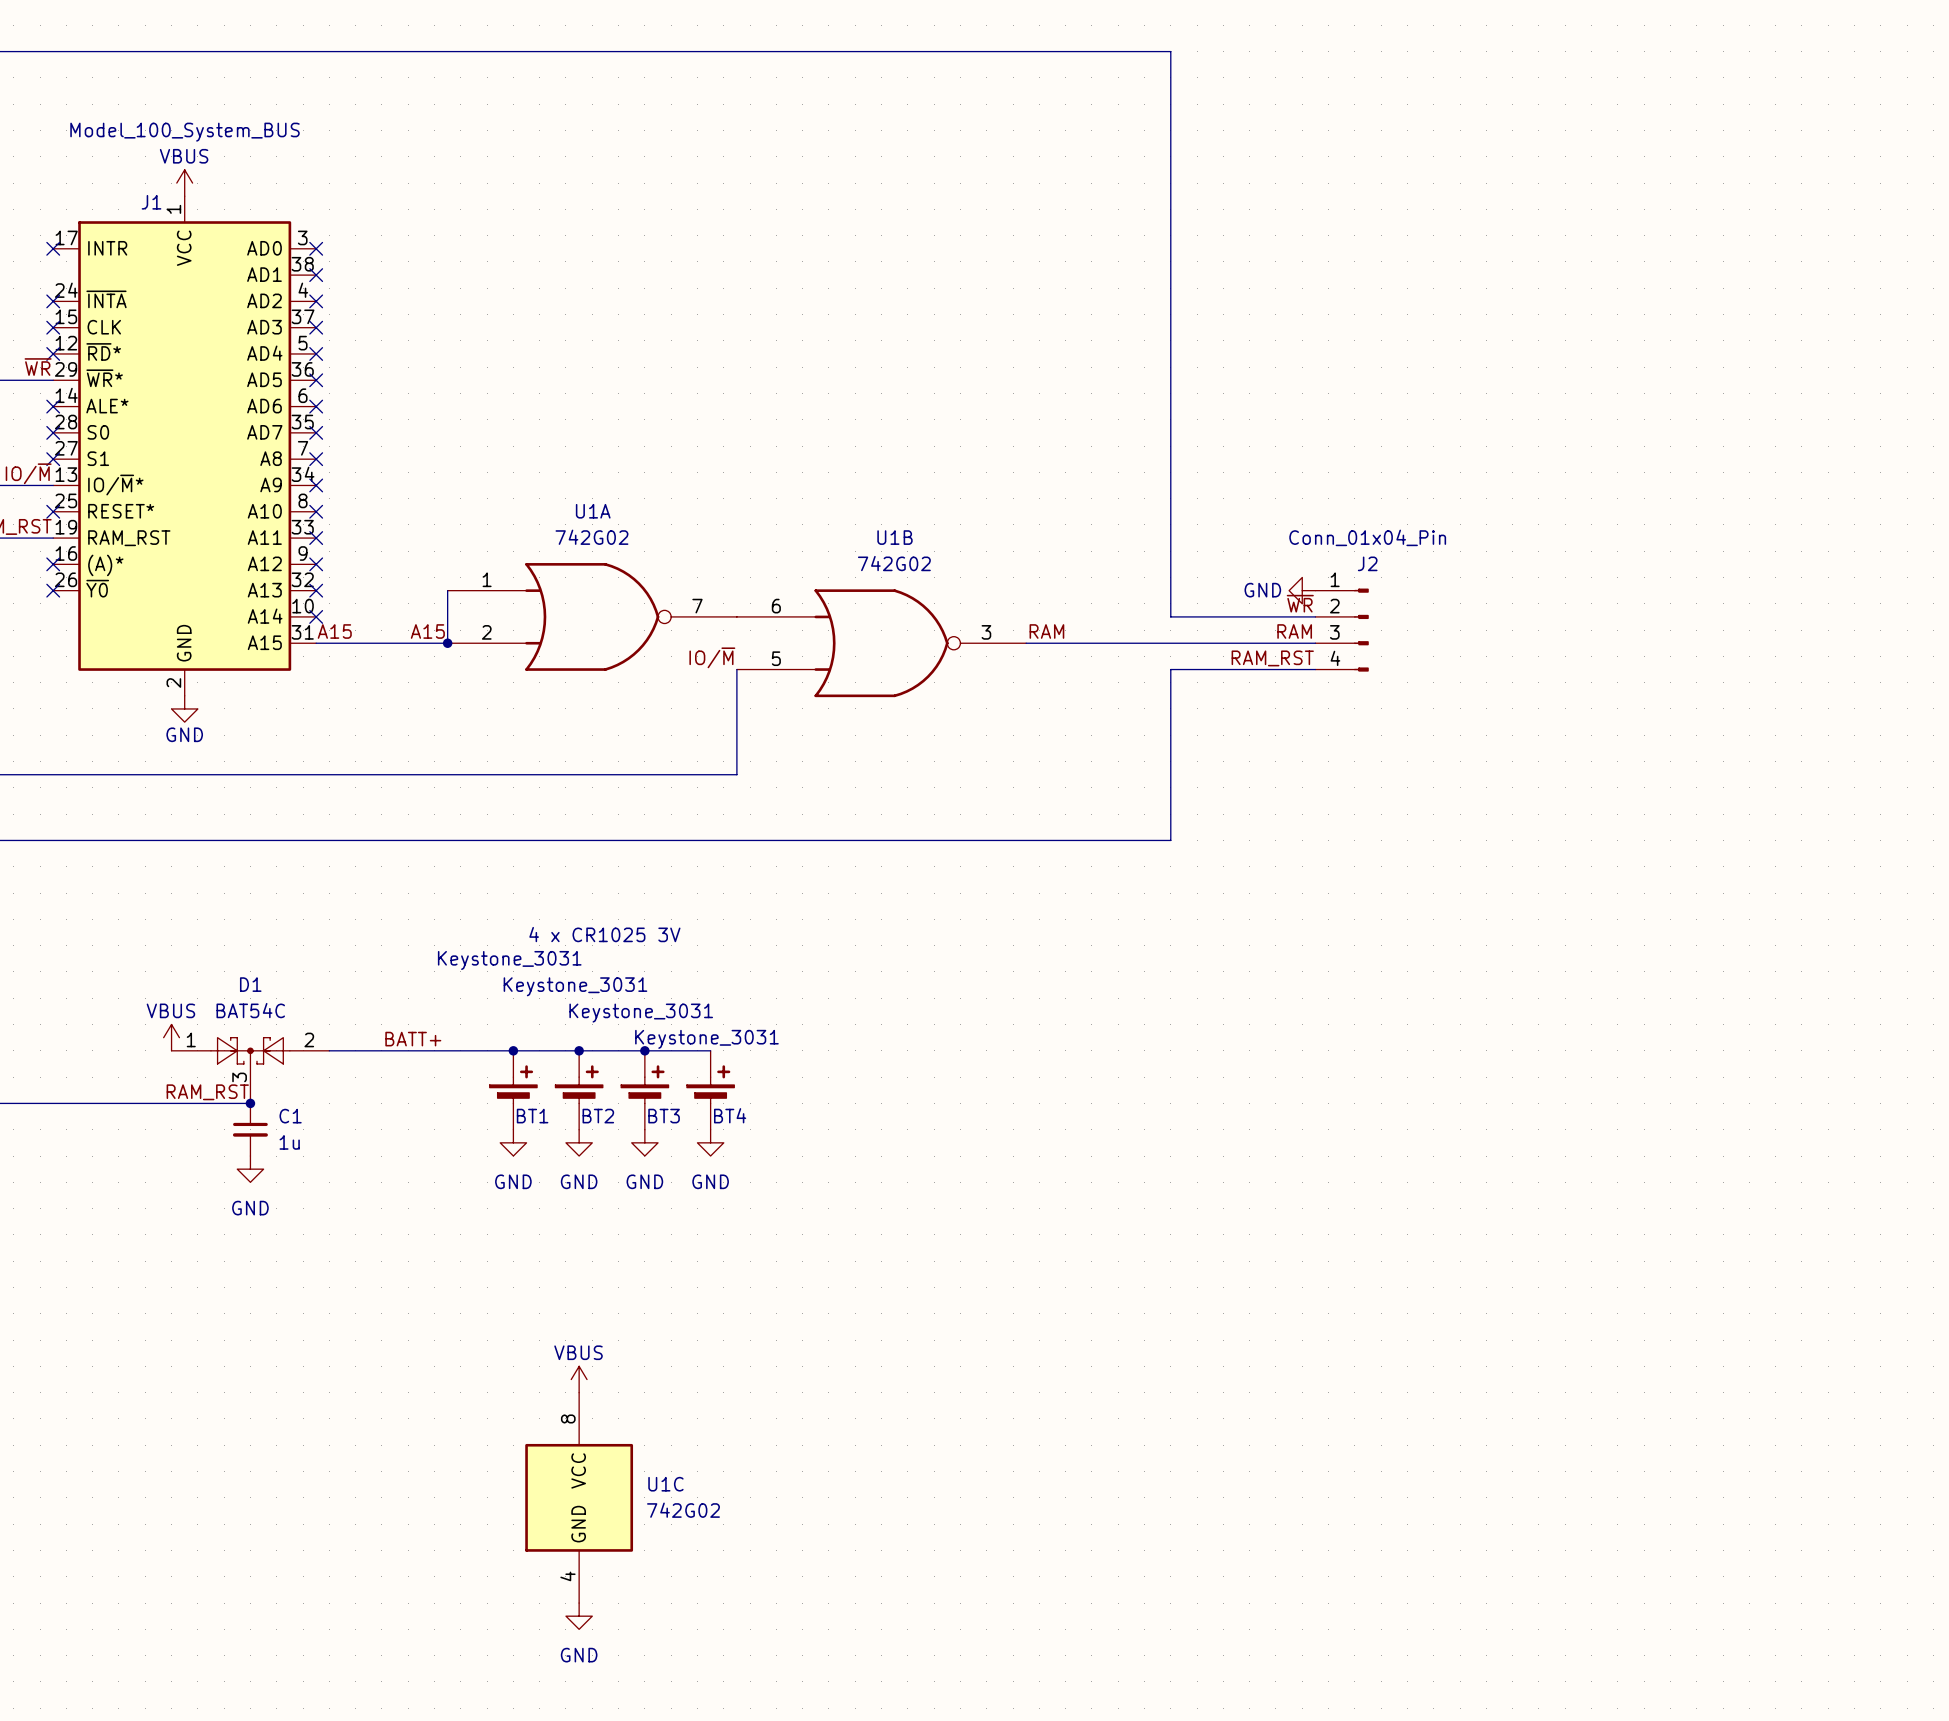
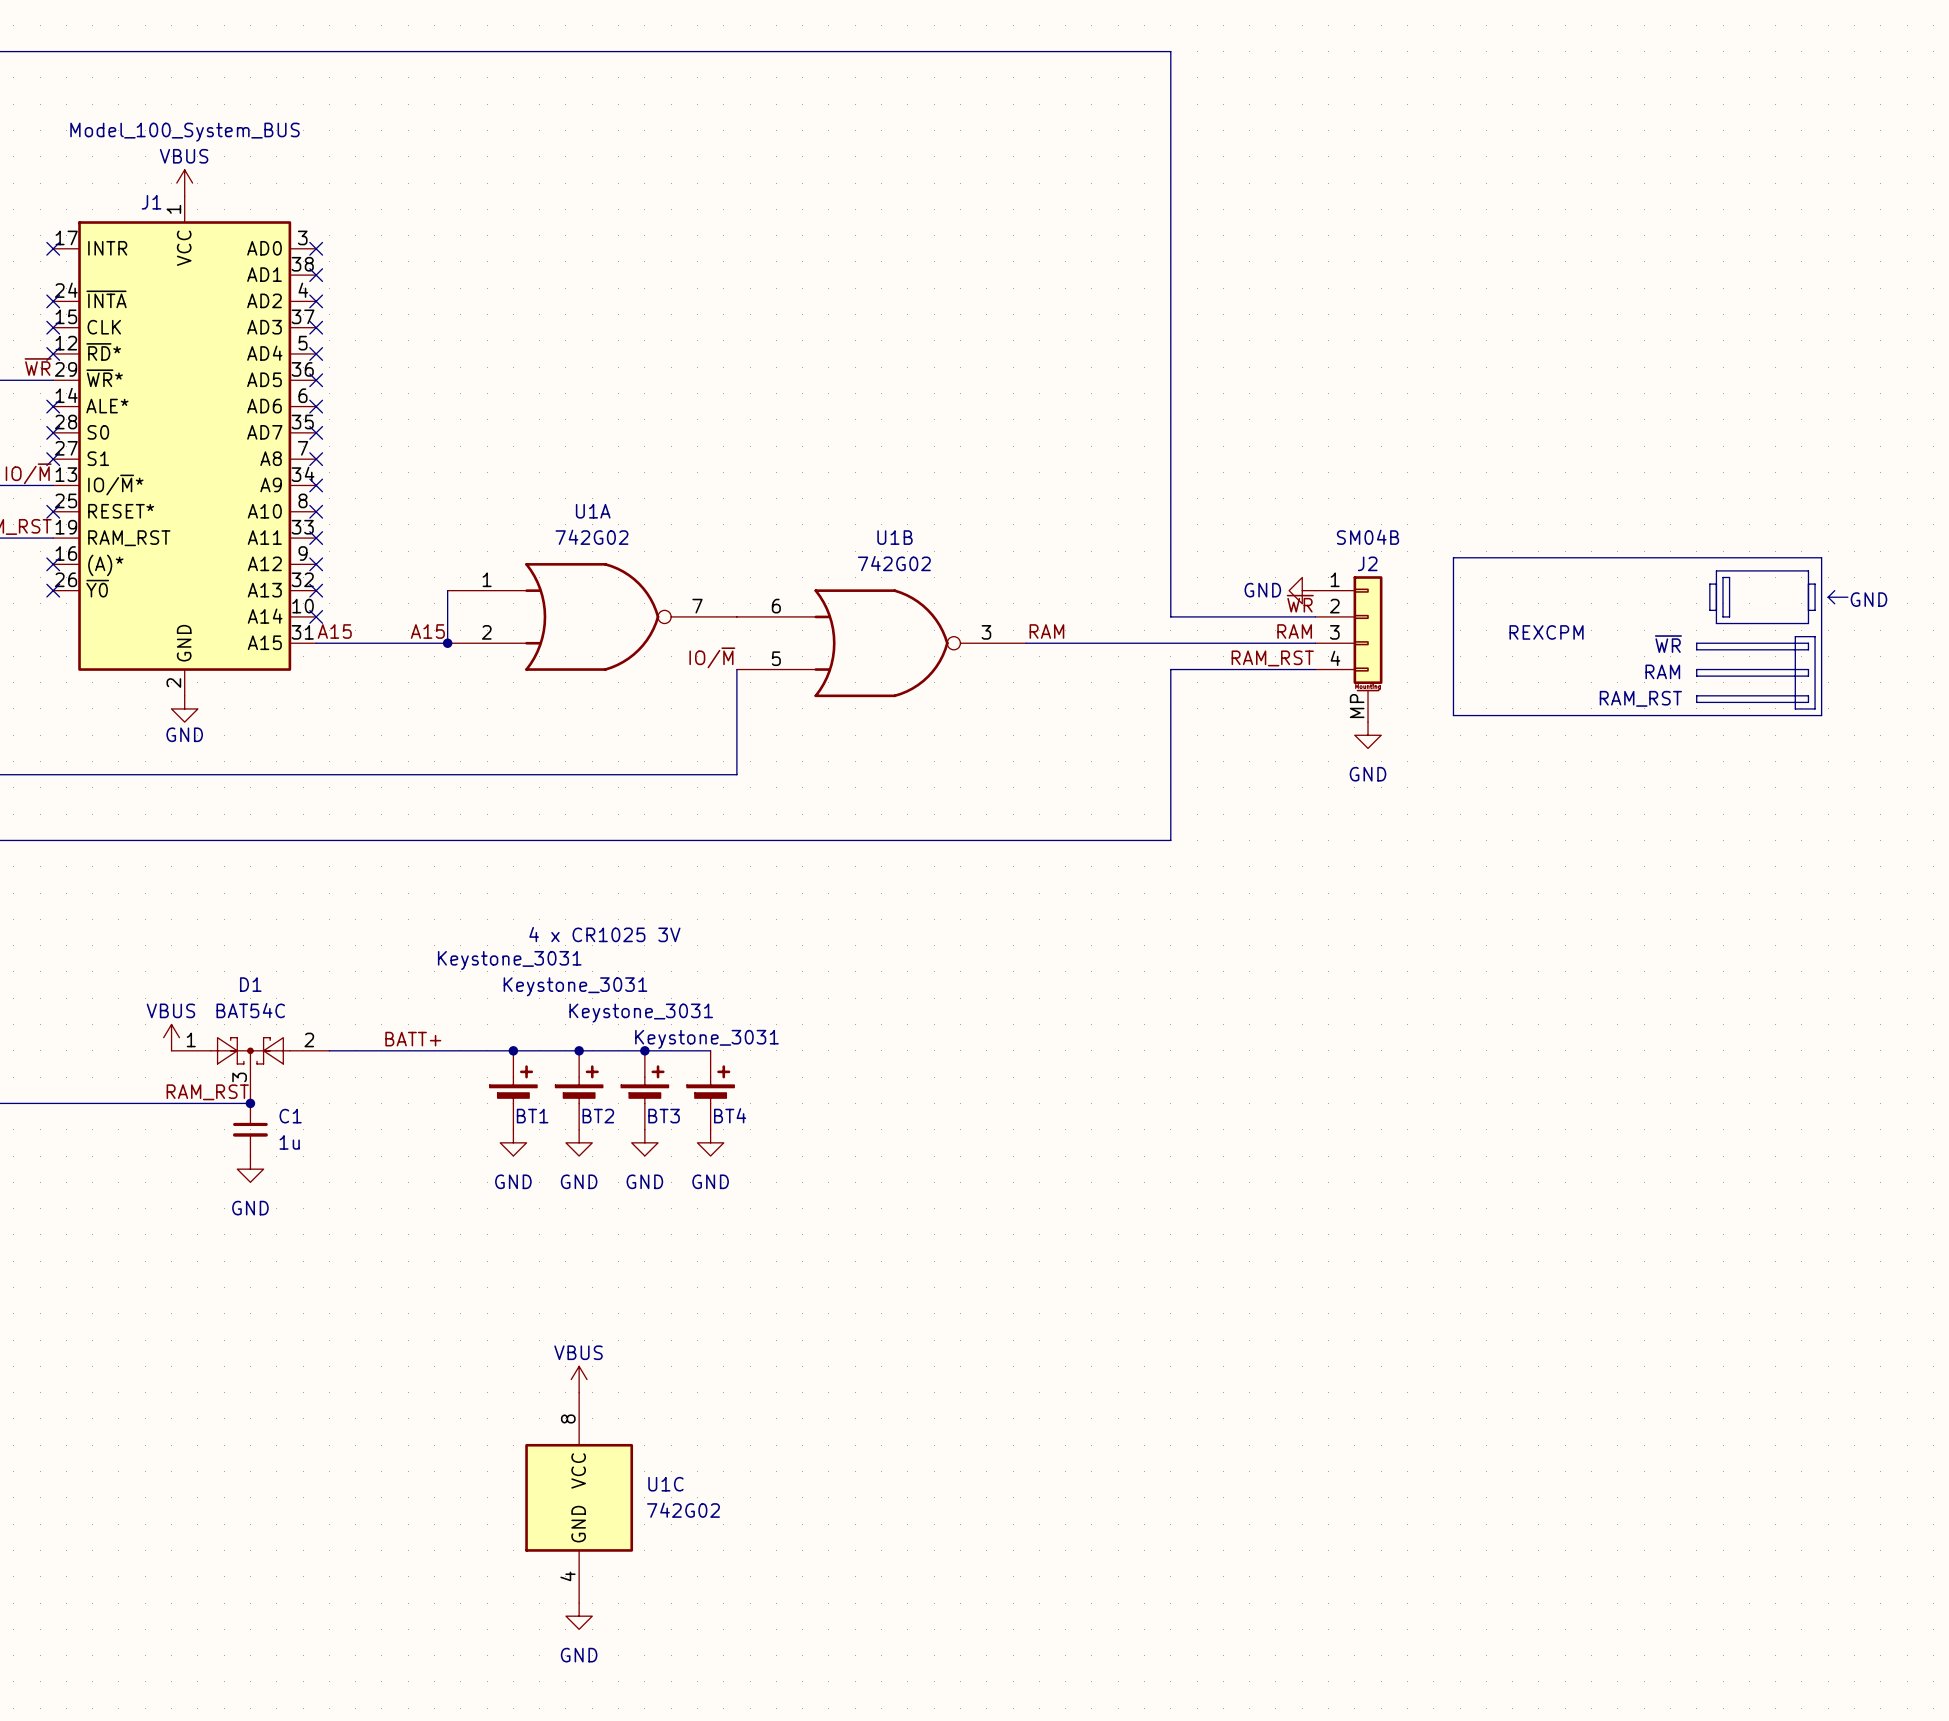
J2 value: Conn_01x04_Pin (1367, 537) -> SM04B (1368, 537)
line: none -> (1453, 557) (1821, 557) (1821, 715) (1453, 715) (1453, 557)
line: none -> (1716, 570) (1808, 570) (1808, 623) (1716, 623) (1716, 570)
line: none -> (1723, 577) (1729, 577) (1729, 616) (1723, 616) (1723, 577)
line: none -> (1716, 584) (1709, 584) (1709, 610) (1716, 610)
line: none -> (1808, 584) (1815, 584) (1815, 610) (1808, 610)
J2 symbol: [1315, 588, 1369, 672] -> [1315, 576, 1383, 723]
line: none -> (1834, 590) (1828, 597)
line: none -> (1828, 597) (1847, 597)
line: none -> (1828, 597) (1834, 603)
text: none -> GND (1868, 599)
text: none -> REXCPM (1546, 632)
line: none -> (1795, 636) (1815, 636) (1815, 708) (1795, 708) (1795, 636)
line: none -> (1696, 643) (1696, 649) (1808, 649) (1808, 643) (1696, 643)
text: none -> ~{WR} (1668, 644)
line: none -> (1696, 669) (1808, 669) (1808, 676) (1696, 676) (1696, 669)
text: none -> RAM (1662, 671)
line: none -> (1696, 695) (1696, 702) (1808, 702) (1808, 695) (1696, 695)
text: none -> RAM_RST (1640, 698)
power symbol: none -> GND (1368, 735)

